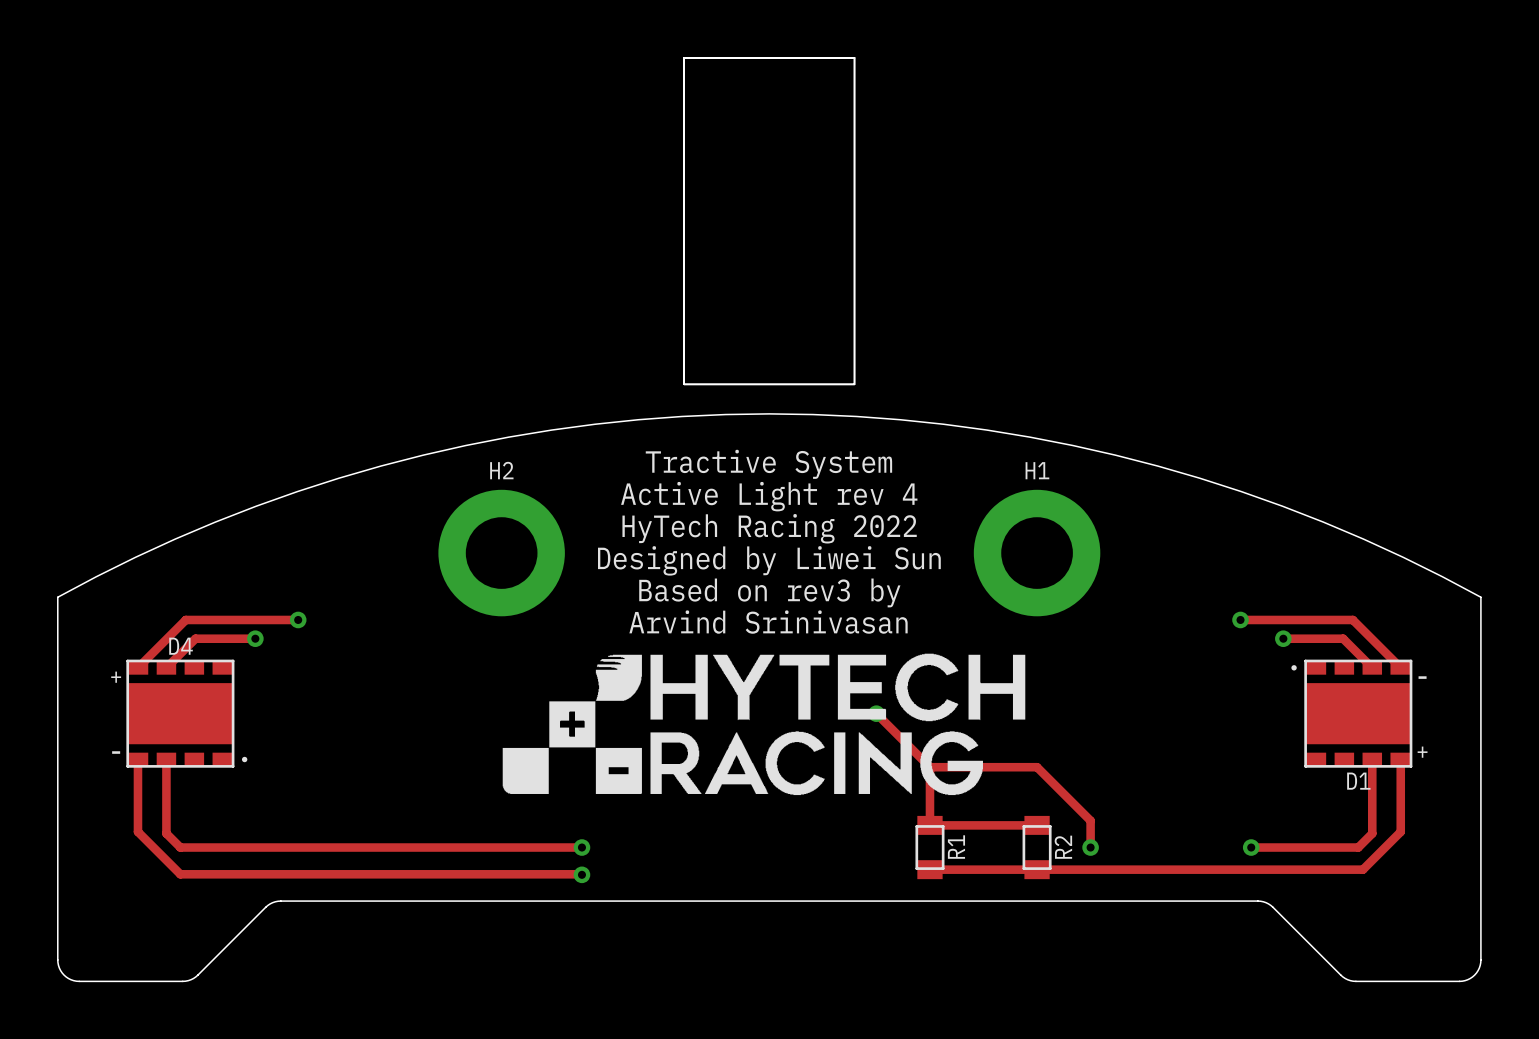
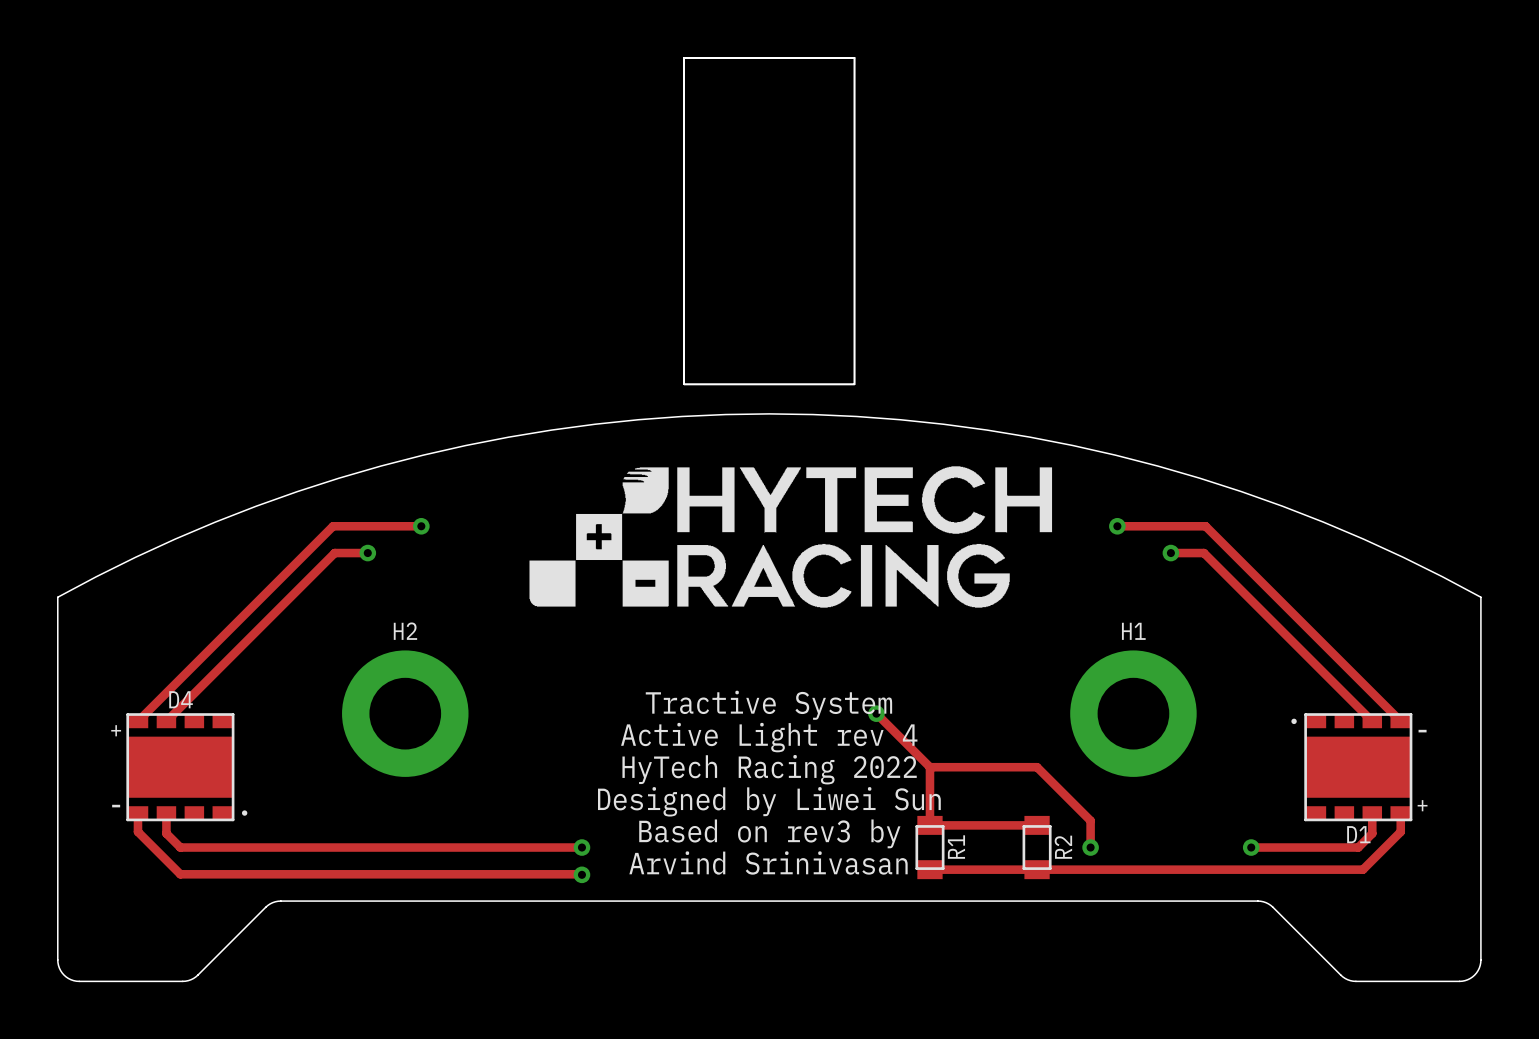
text position: Tractive System (768, 464) -> Tractive System (768, 705)
text position: Active Light rev 4 (769, 496) -> Active Light rev 4 (769, 737)
track: none -> (421, 526) (333, 526) (137, 721)
via: none -> (421, 526)
track: none -> (1117, 526) (1205, 526) (1400, 721)
via: none -> (1117, 526)
text position: HyTech Racing 2022 (769, 528) -> HyTech Racing 2022 (769, 769)
track: none -> (367, 553) (334, 553) (166, 721)
via: none -> (367, 553)
H2 position: (501, 553) -> (405, 713)
H1 position: (1037, 553) -> (1133, 713)
track: none -> (1170, 553) (1203, 553) (1372, 721)
via: none -> (1170, 553)
text position: Designed by Liwei Sun (769, 560) -> Designed by Liwei Sun (769, 801)
text position: Based on rev3 by (769, 592) -> Based on rev3 by (769, 833)
track: (298, 619) (185, 619) (137, 667) -> none
via: (298, 619) -> none
track: (1240, 619) (1352, 619) (1400, 667) -> none
via: (1240, 619) -> none
text position: Arvind Srinivasan (768, 622) -> Arvind Srinivasan (768, 863)
track: (255, 638) (195, 638) (166, 667) -> none
via: (255, 638) -> none
track: (1283, 638) (1343, 638) (1372, 667) -> none
via: (1283, 638) -> none
D4 position: (186, 713) -> (186, 767)
D1 position: (1351, 713) -> (1351, 767)
drawing position: (764, 724) -> (790, 536)
track: (137, 759) (137, 813) -> none
track: (166, 759) (166, 813) -> none
track: (1372, 759) (1372, 813) -> none
track: (1400, 759) (1400, 813) -> none

